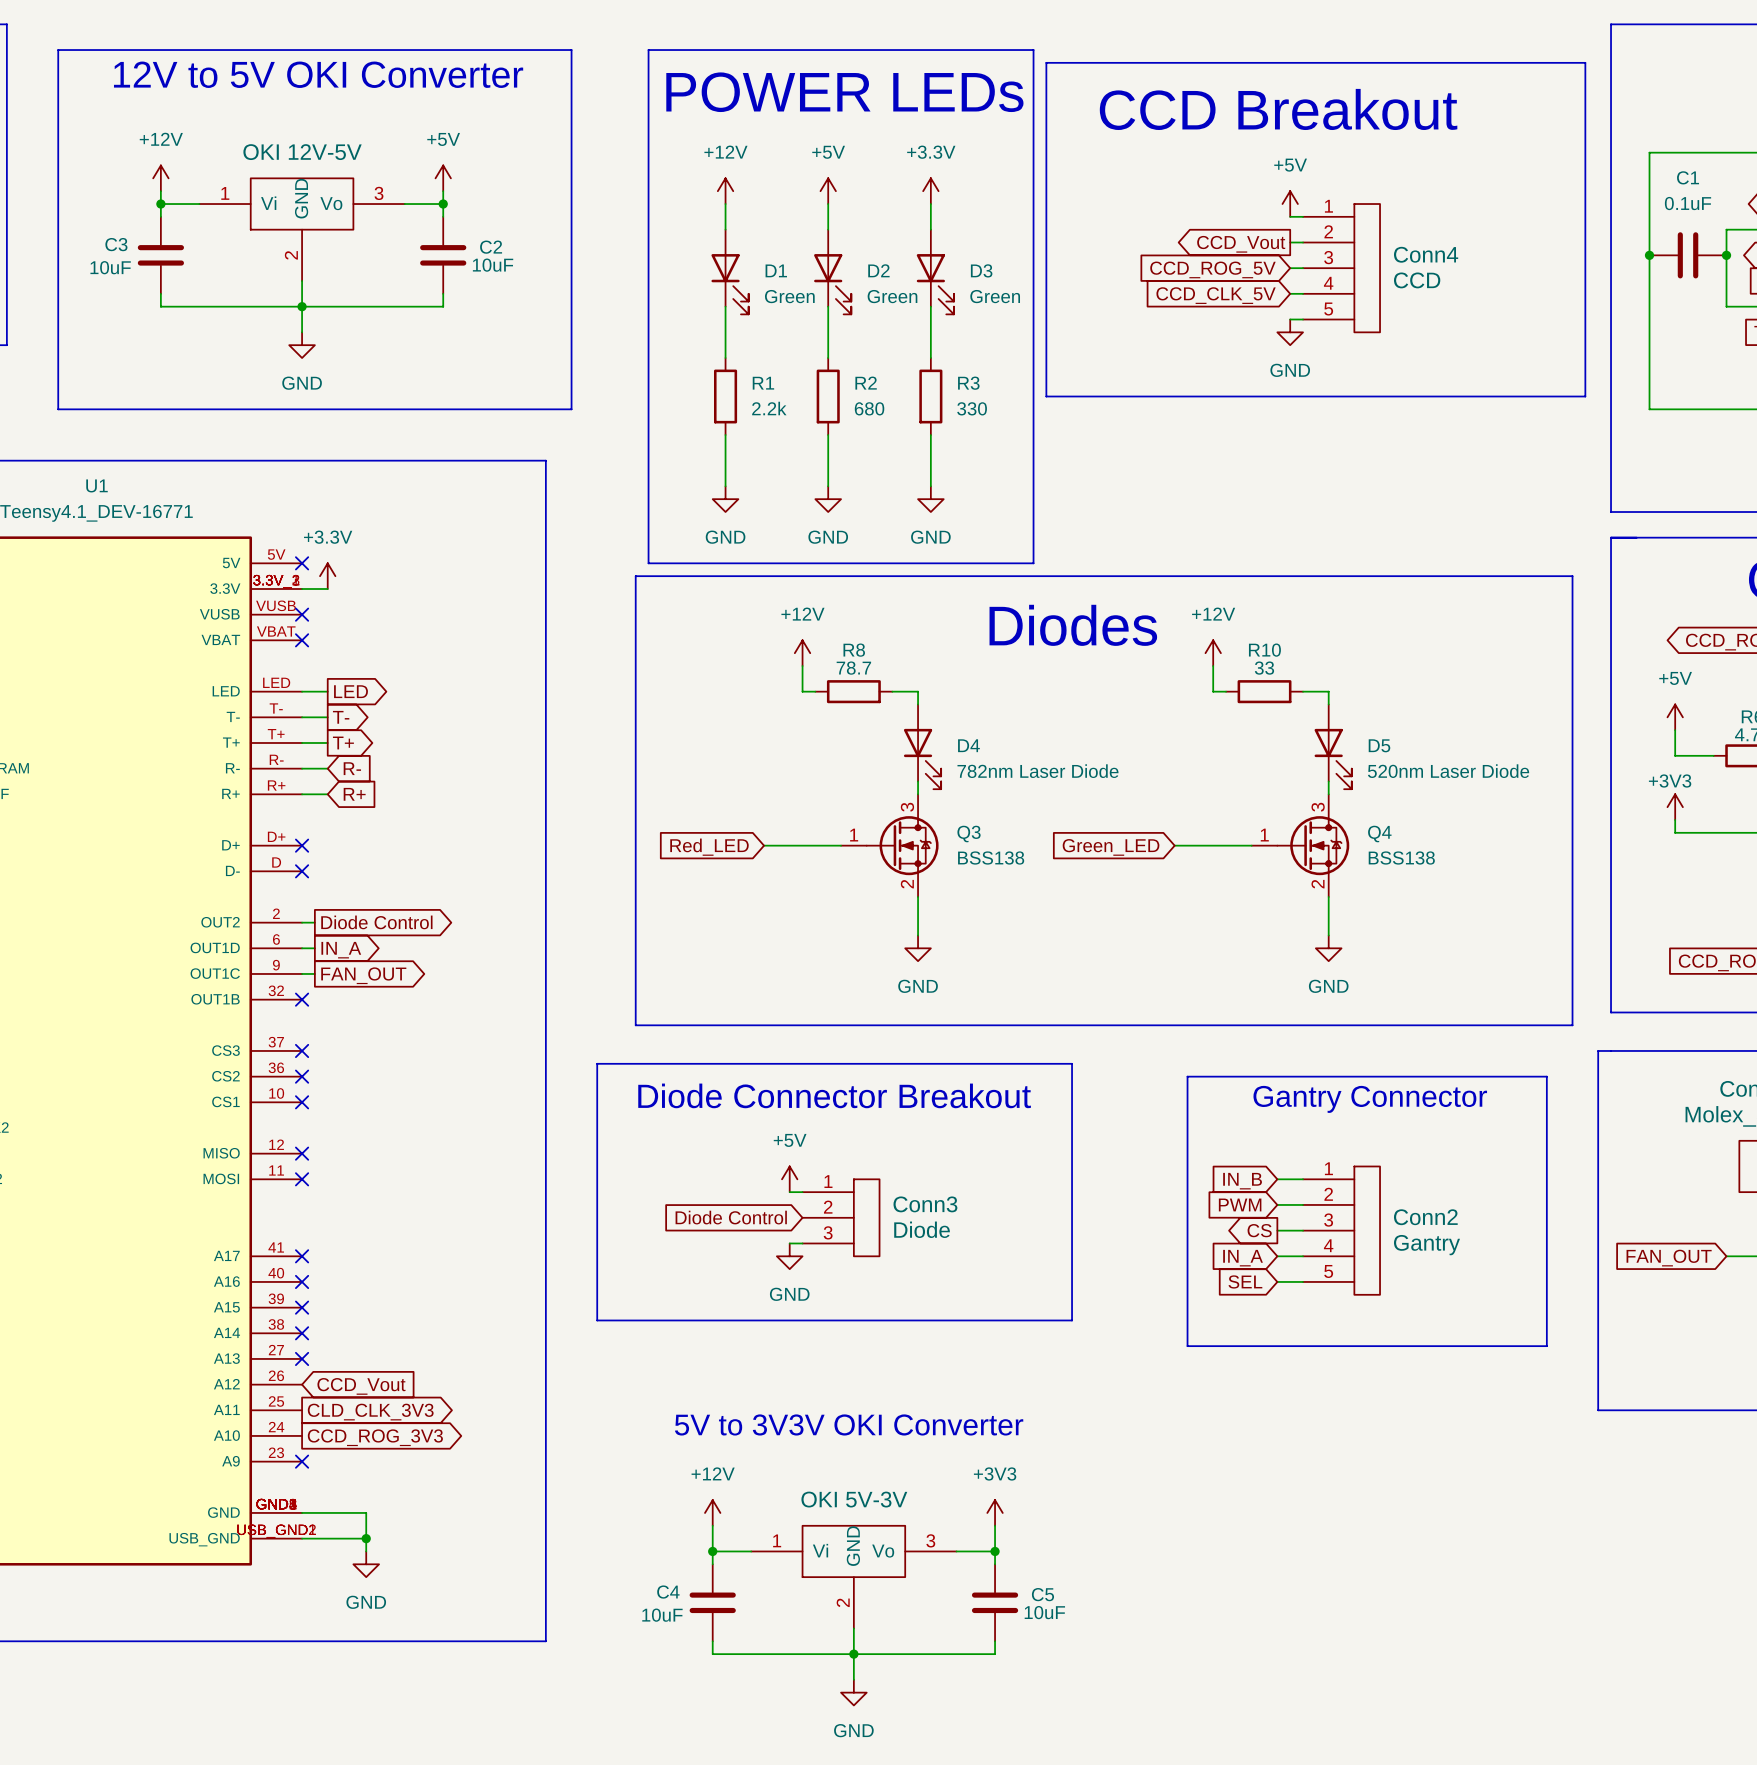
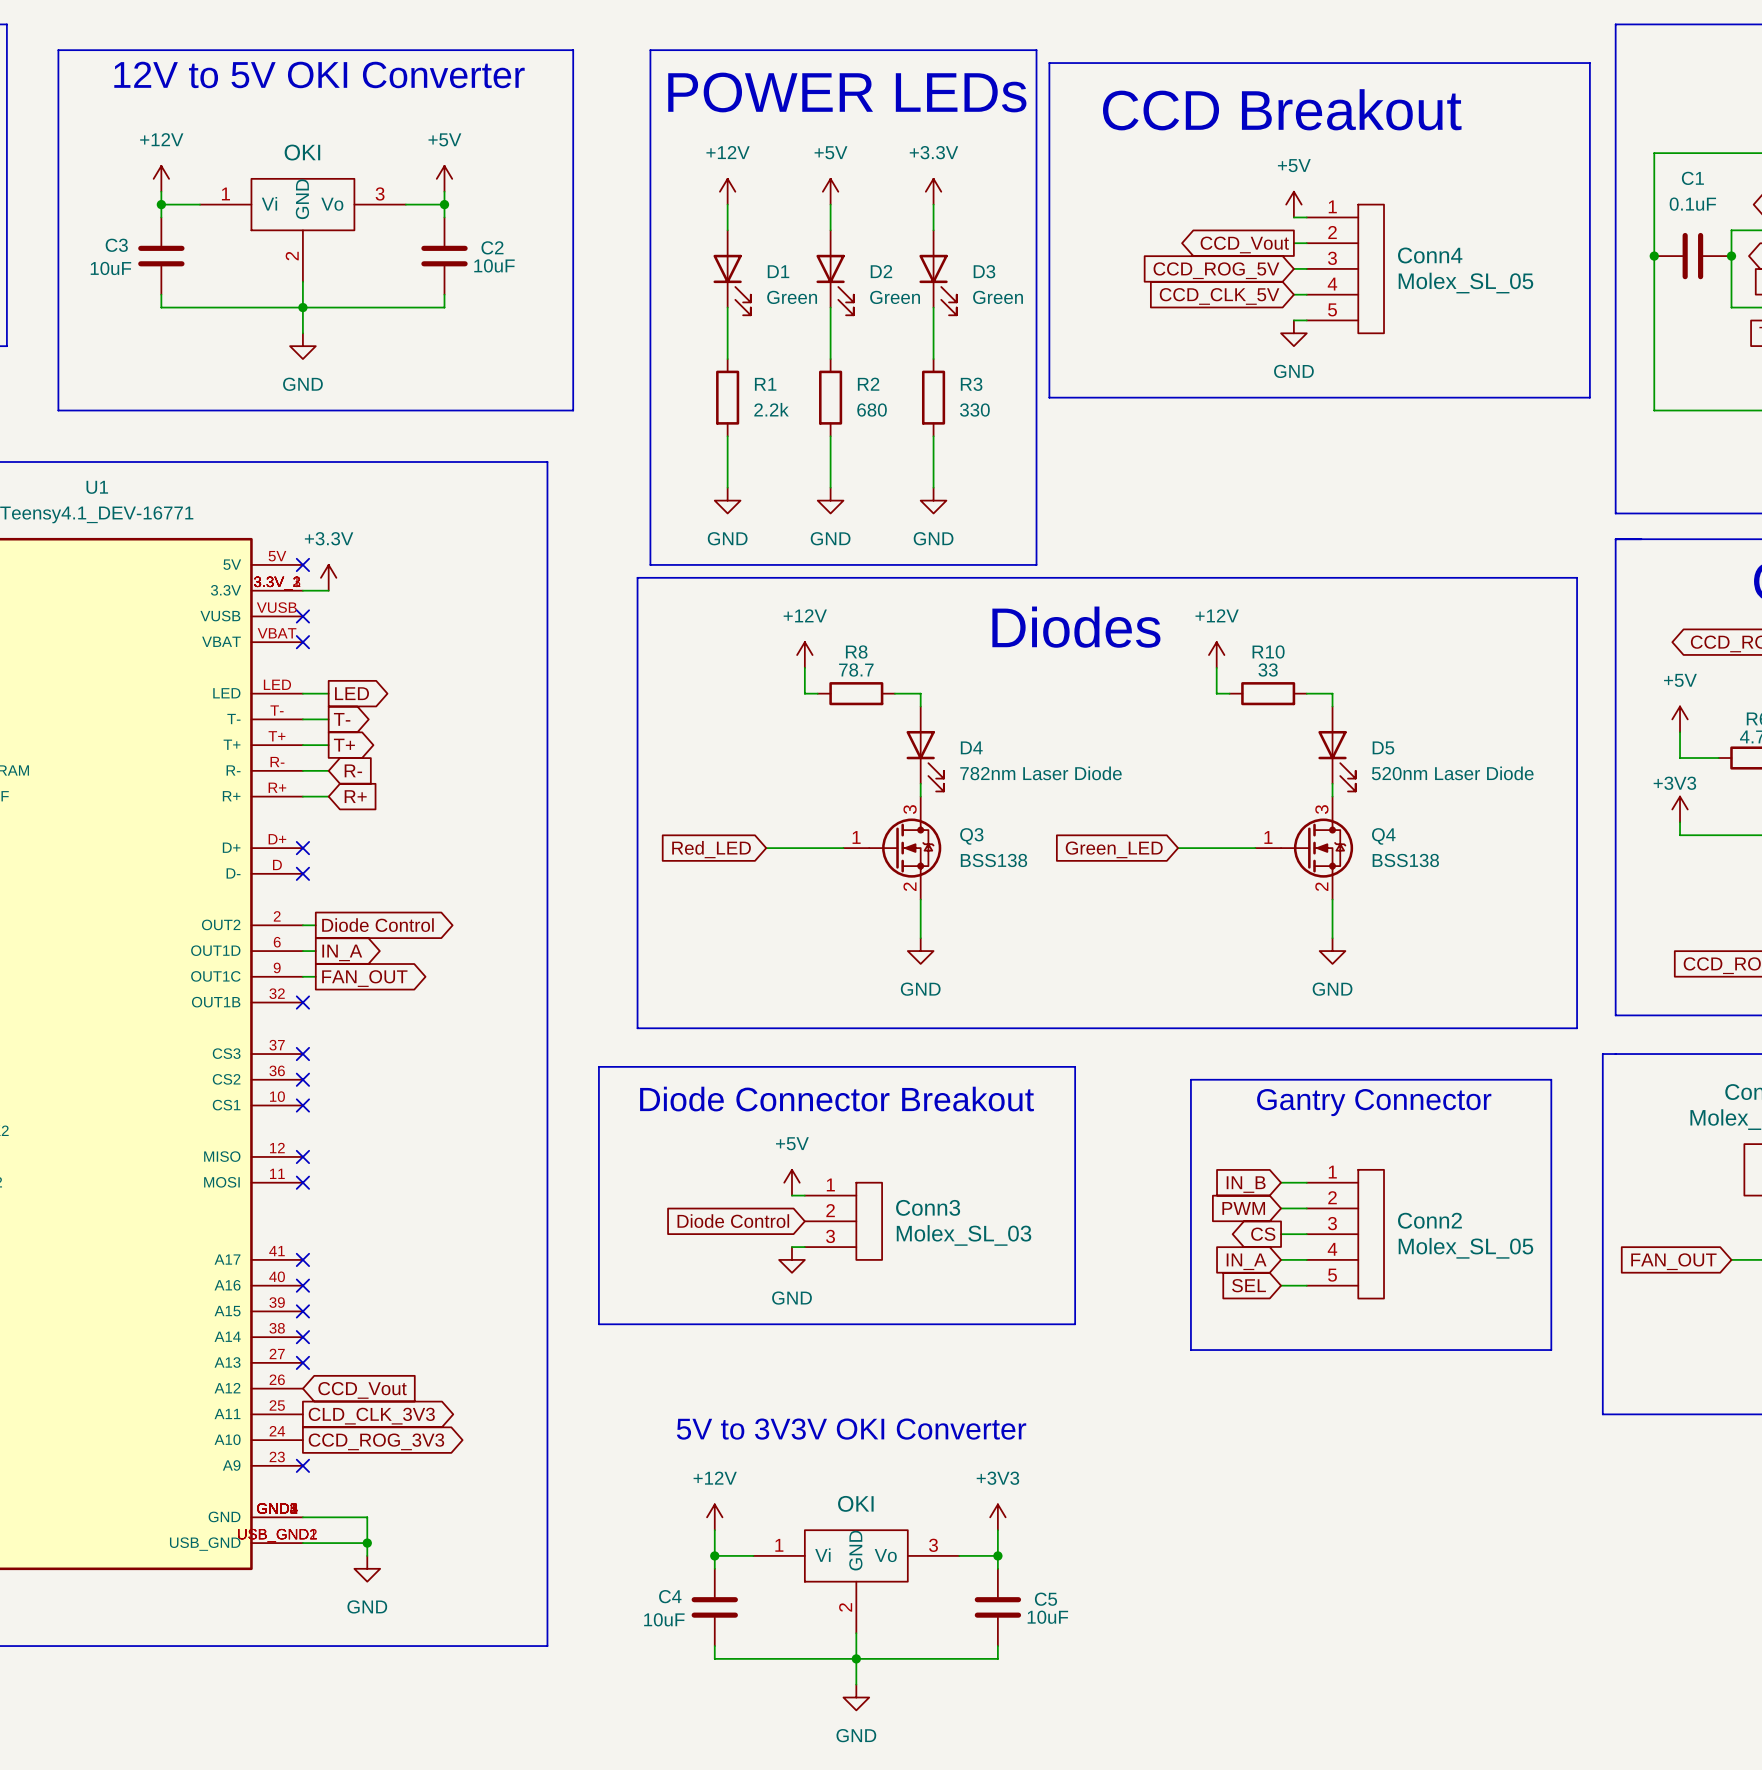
part value: OKI 12V-5V (302, 152) -> OKI (302, 152)
Conn4 value: CCD (1417, 280) -> Molex_SL_05 (1465, 283)
Conn3 value: Diode (922, 1229) -> Molex_SL_03 (964, 1235)
Conn2 value: Gantry (1426, 1245) -> Molex_SL_05 (1465, 1248)
part value: OKI 5V-3V (854, 1499) -> OKI (855, 1503)

